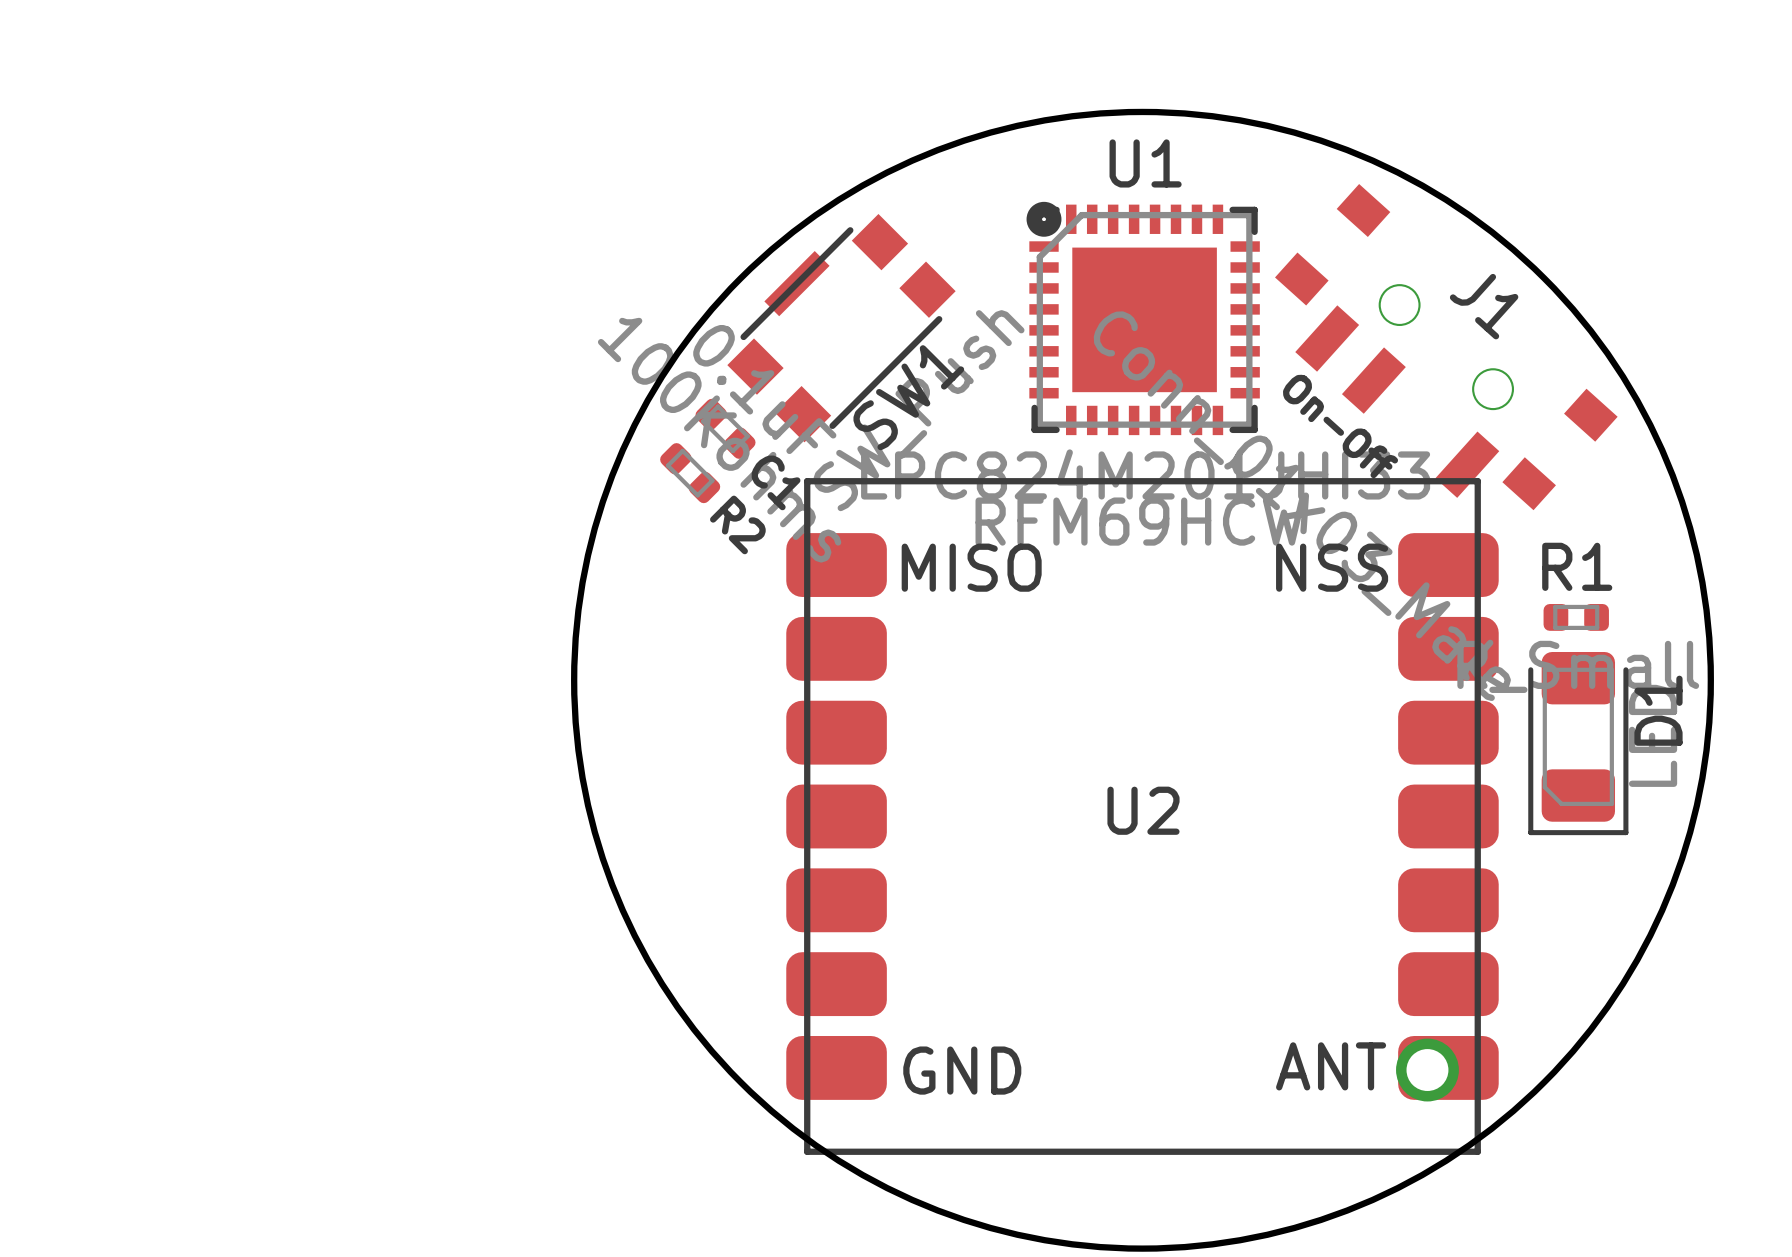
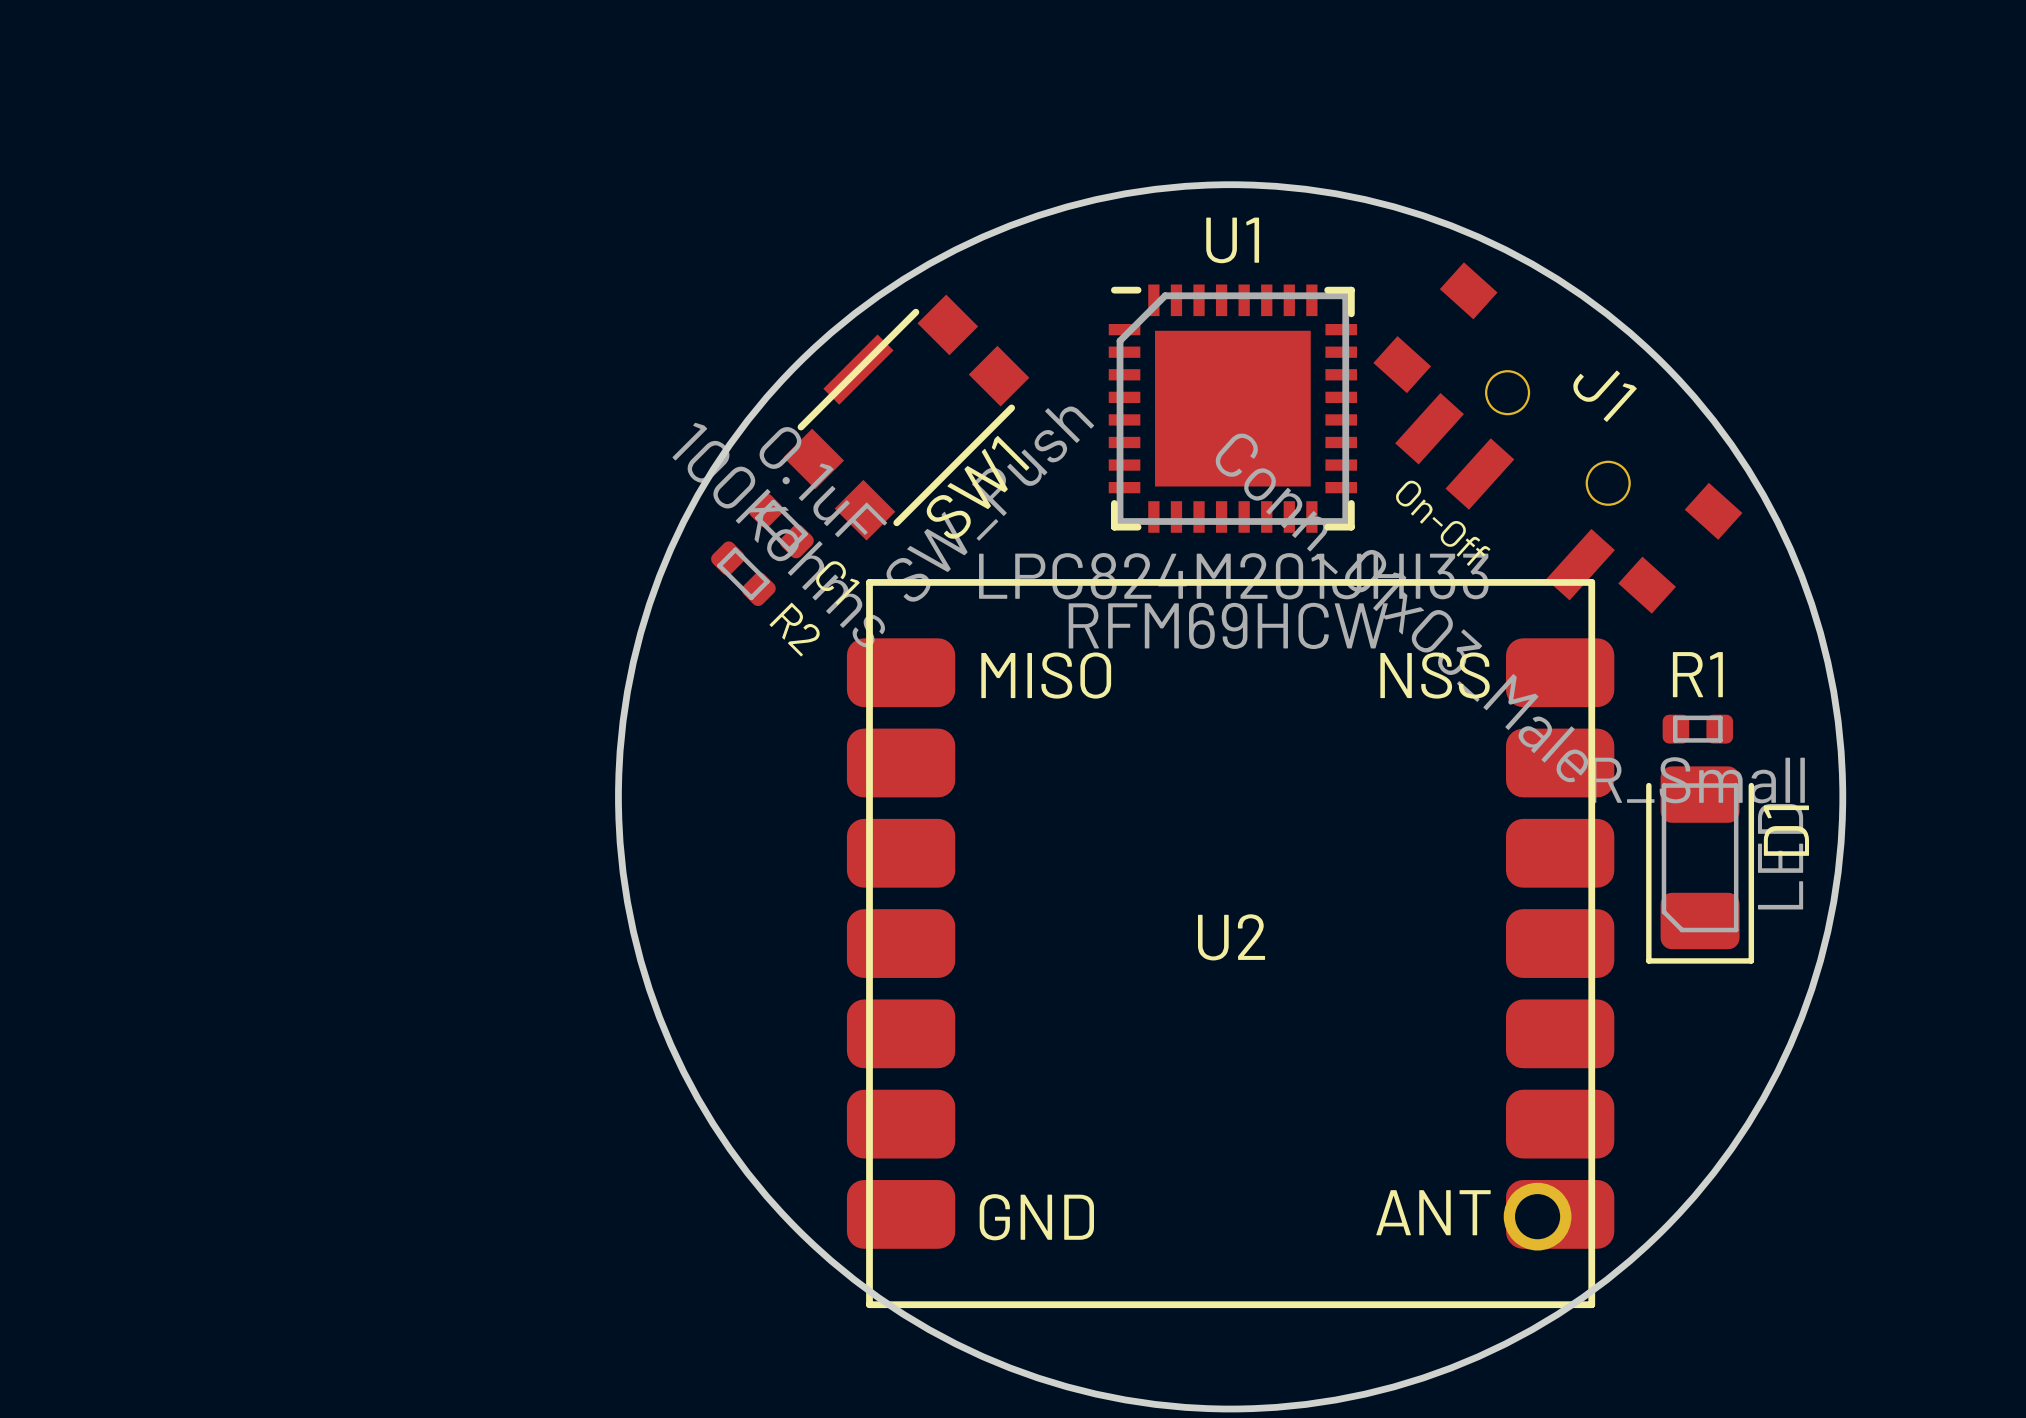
drawing: [1026, 201, 1062, 237] -> none

